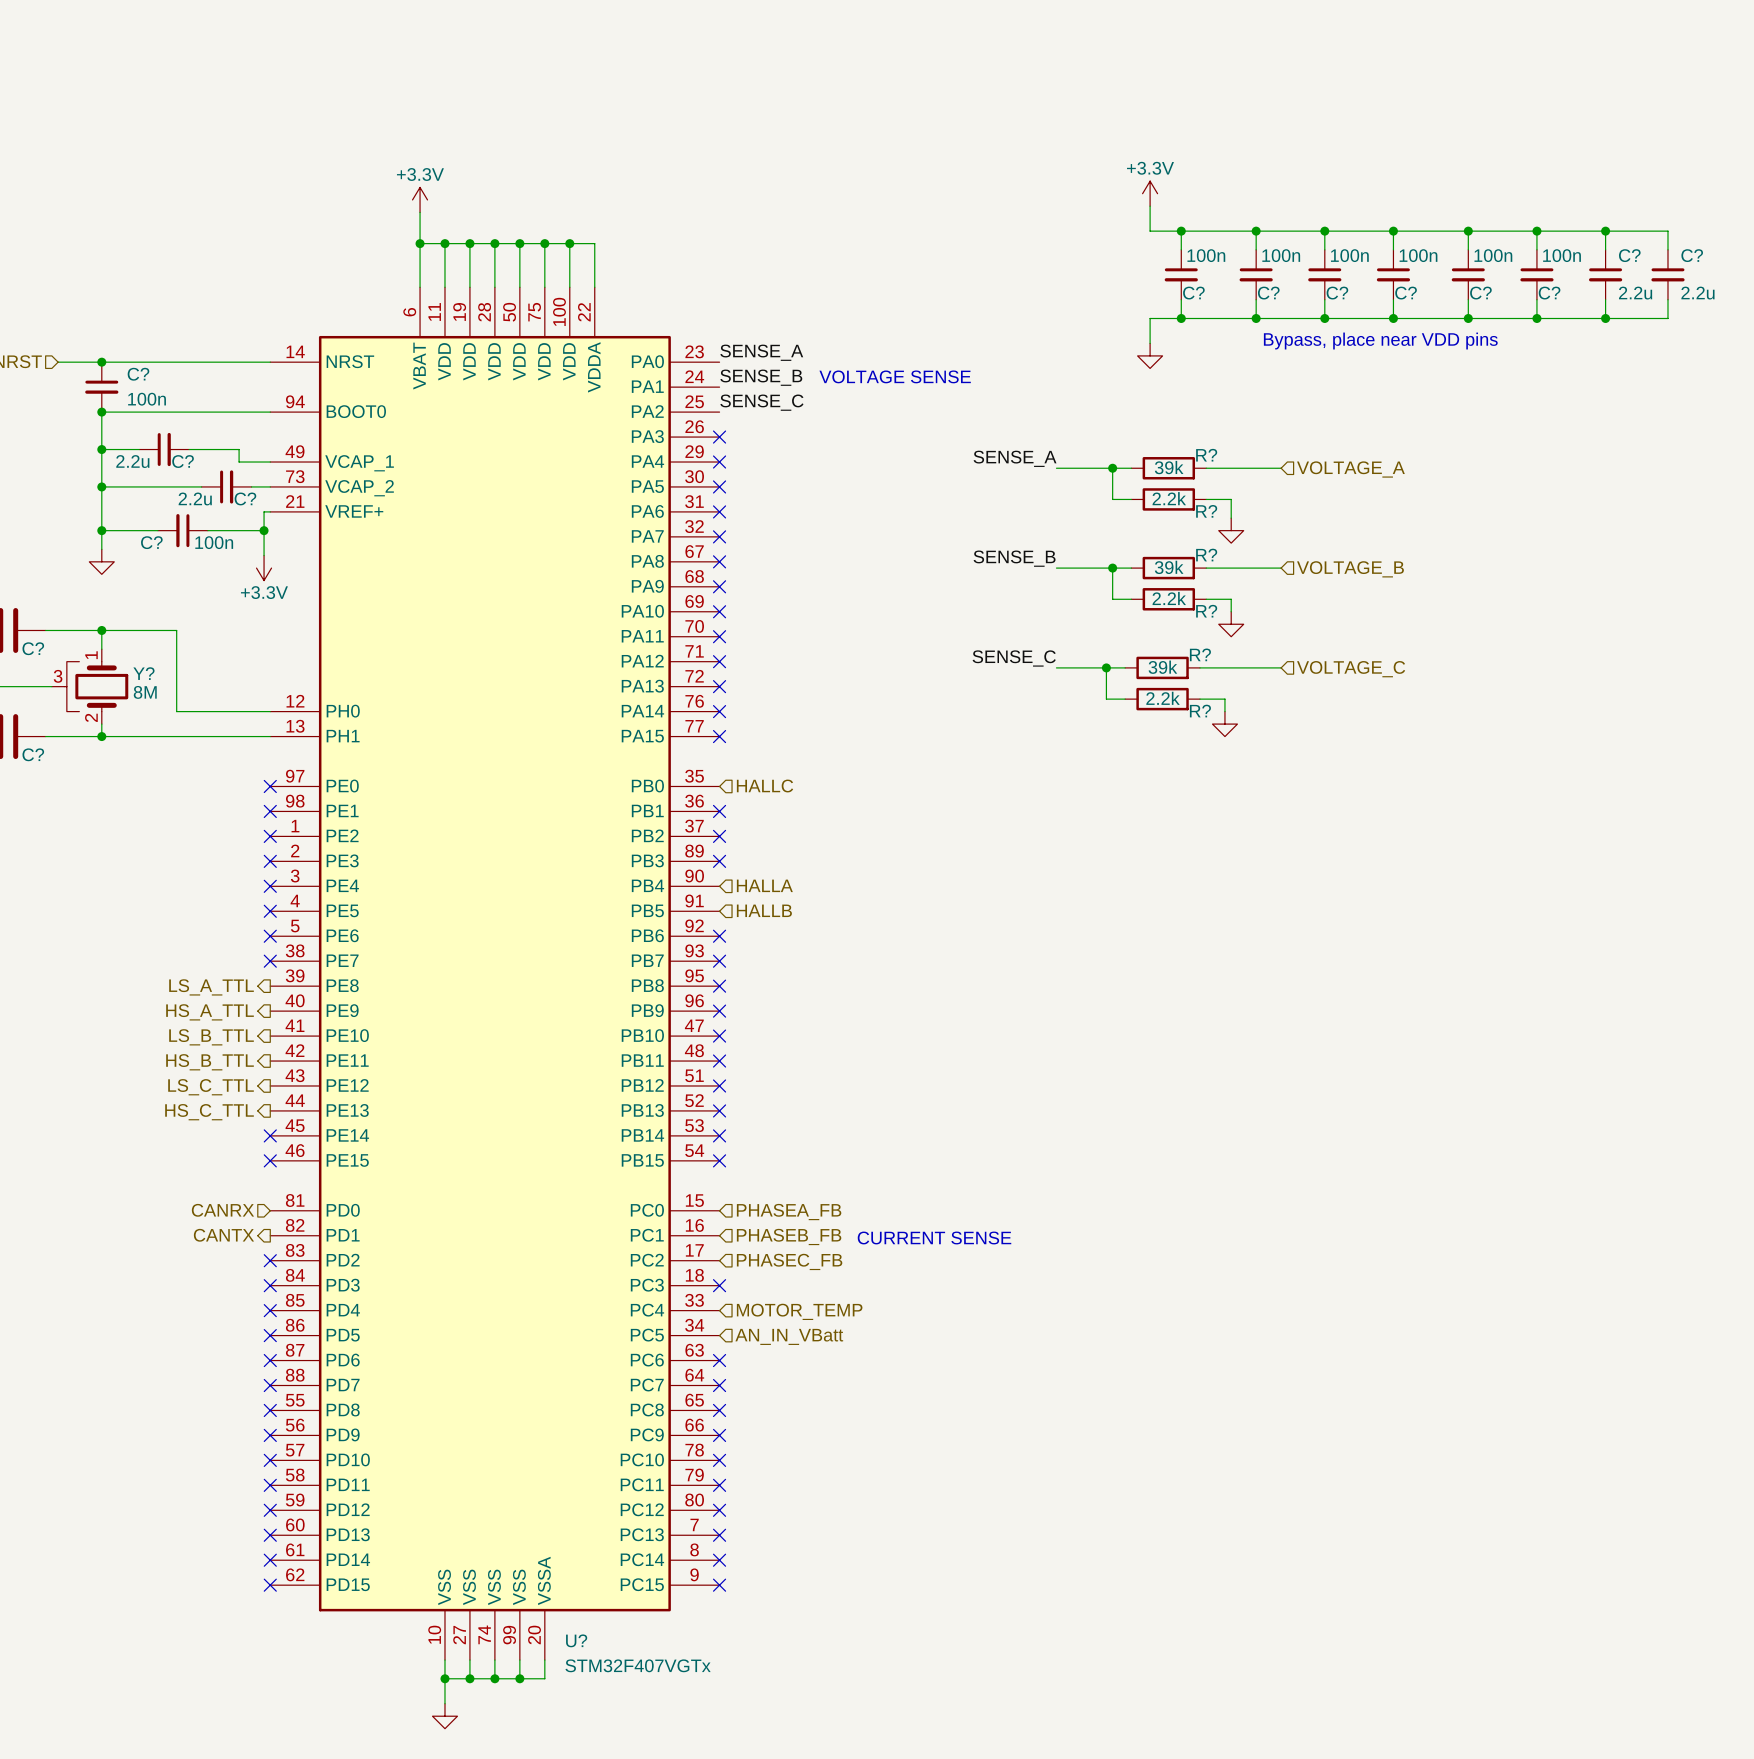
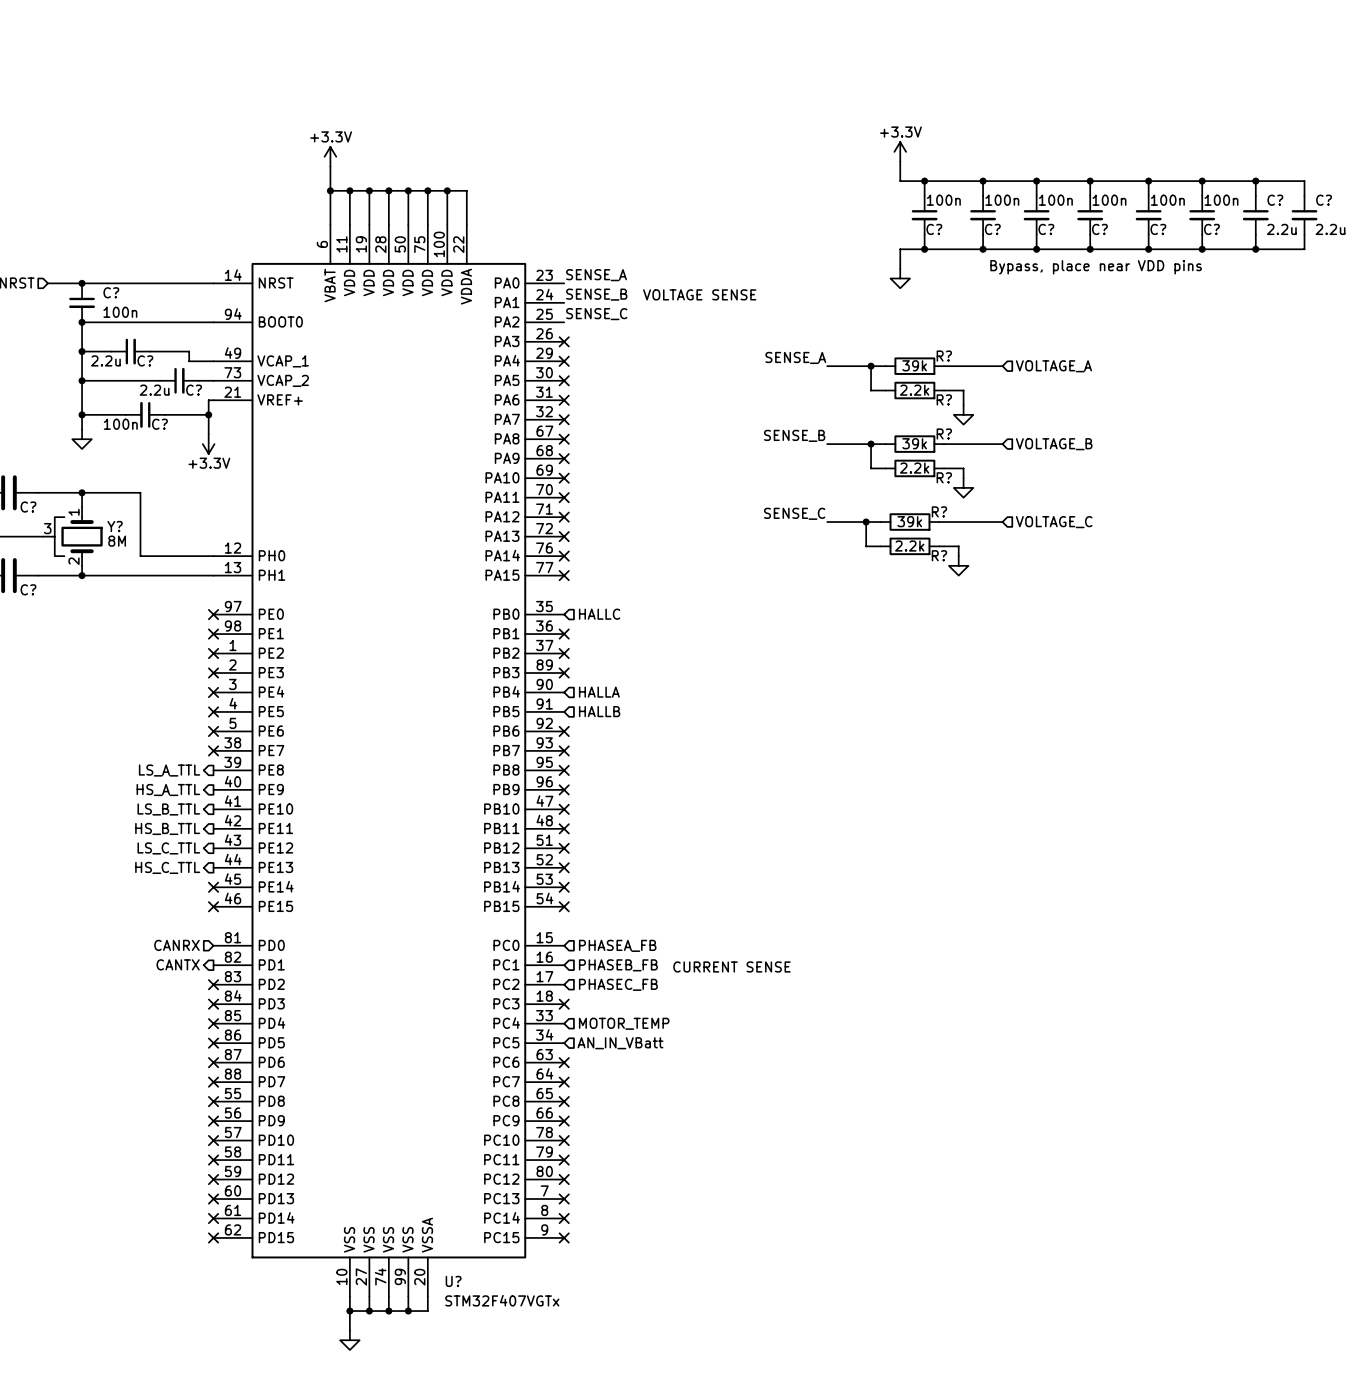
C? name position: C? (151, 542) -> C? (159, 424)
C? value position: 100n (214, 542) -> 100n (120, 424)

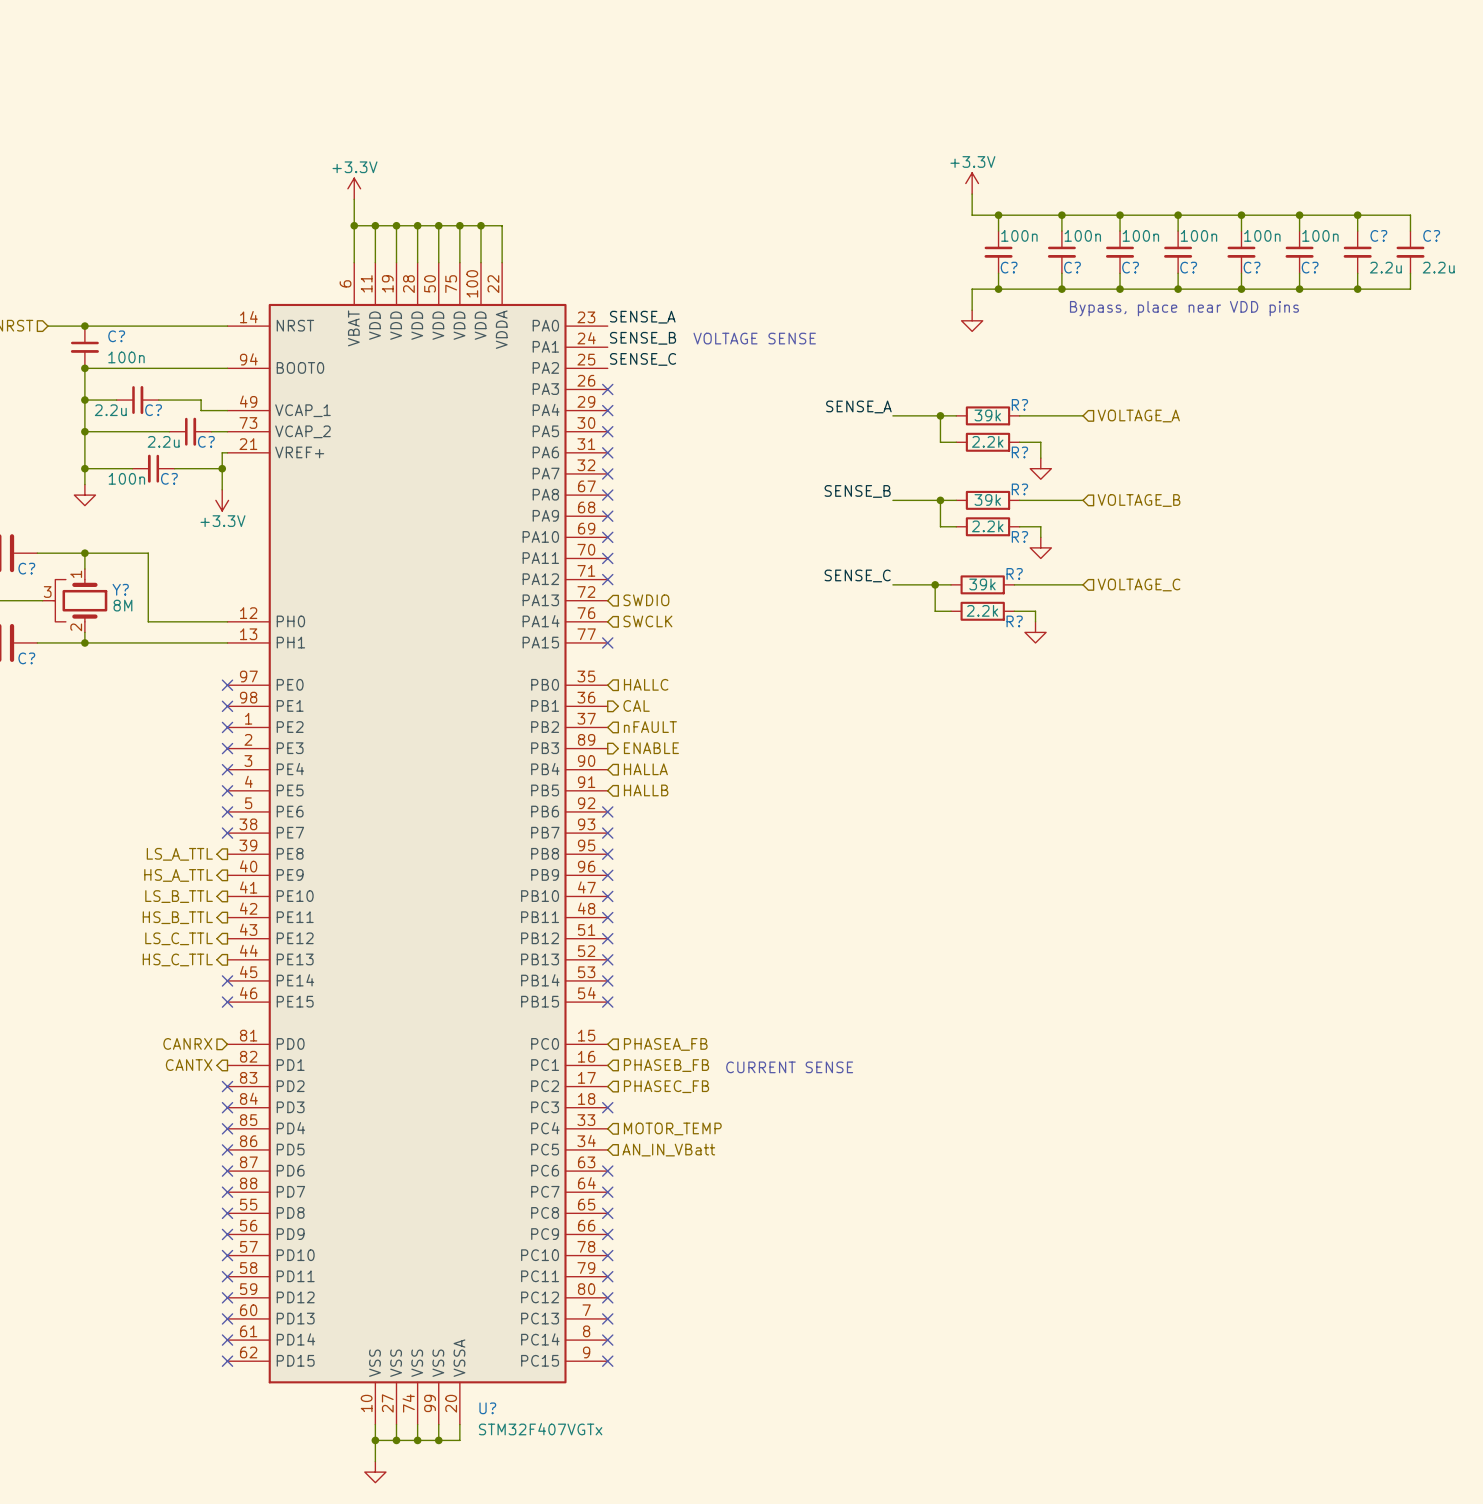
no-connect mark: (564, 536) -> none
hierarchical label: none -> SWDIO (646, 600)
hierarchical label: none -> SWCLK (647, 621)
no-connect mark: (564, 556) -> none
hierarchical label: none -> CAL (636, 705)
no-connect mark: (564, 634) -> none
no-connect mark: (564, 653) -> none
hierarchical label: none -> nFAULT (650, 727)
hierarchical label: none -> ENABLE (651, 748)
no-connect mark: (564, 673) -> none

